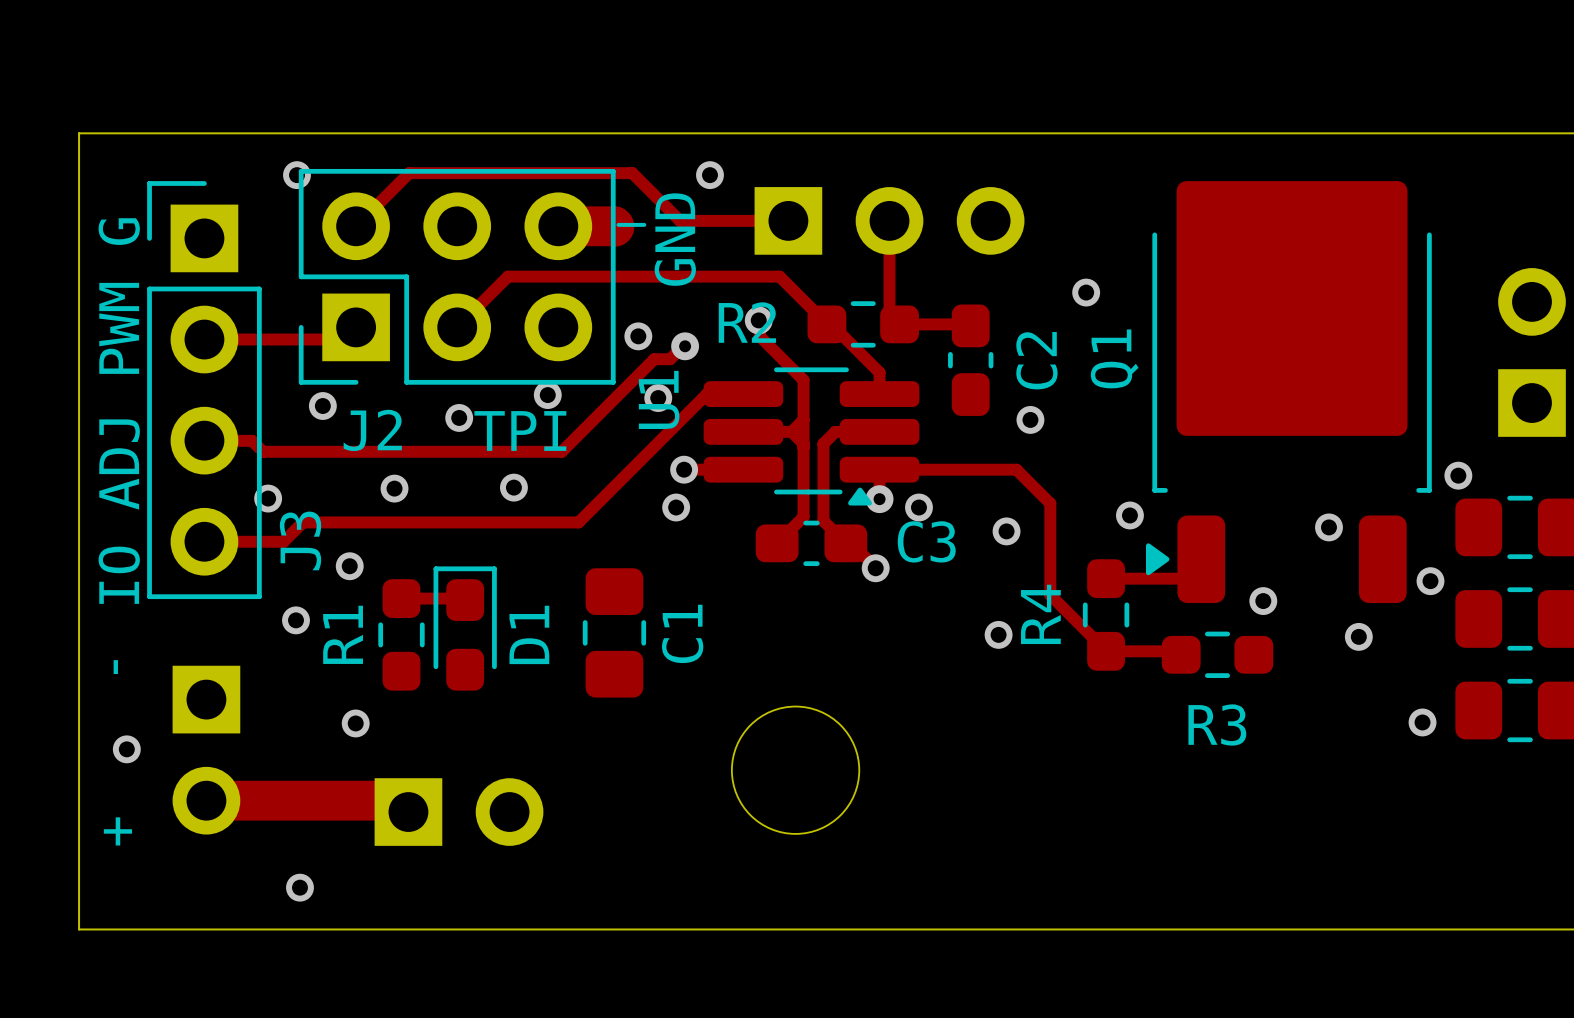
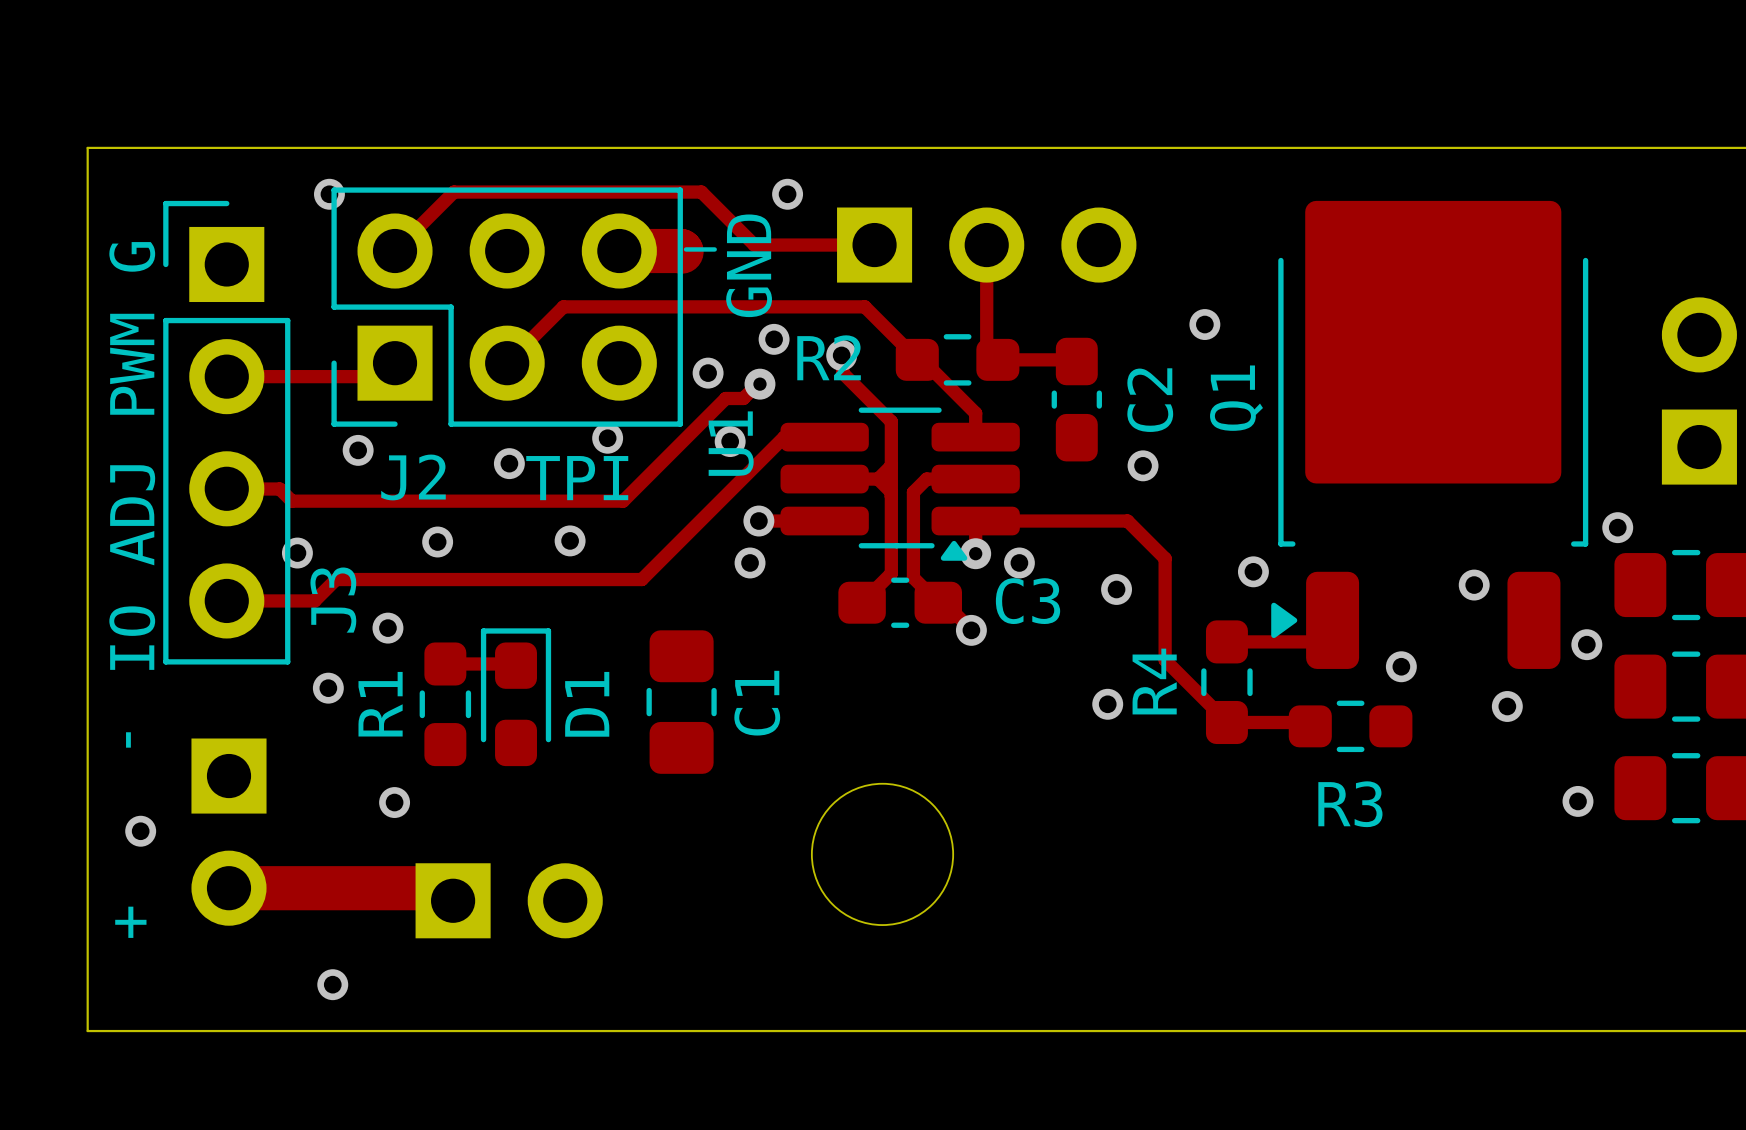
via: none -> (774, 339)

